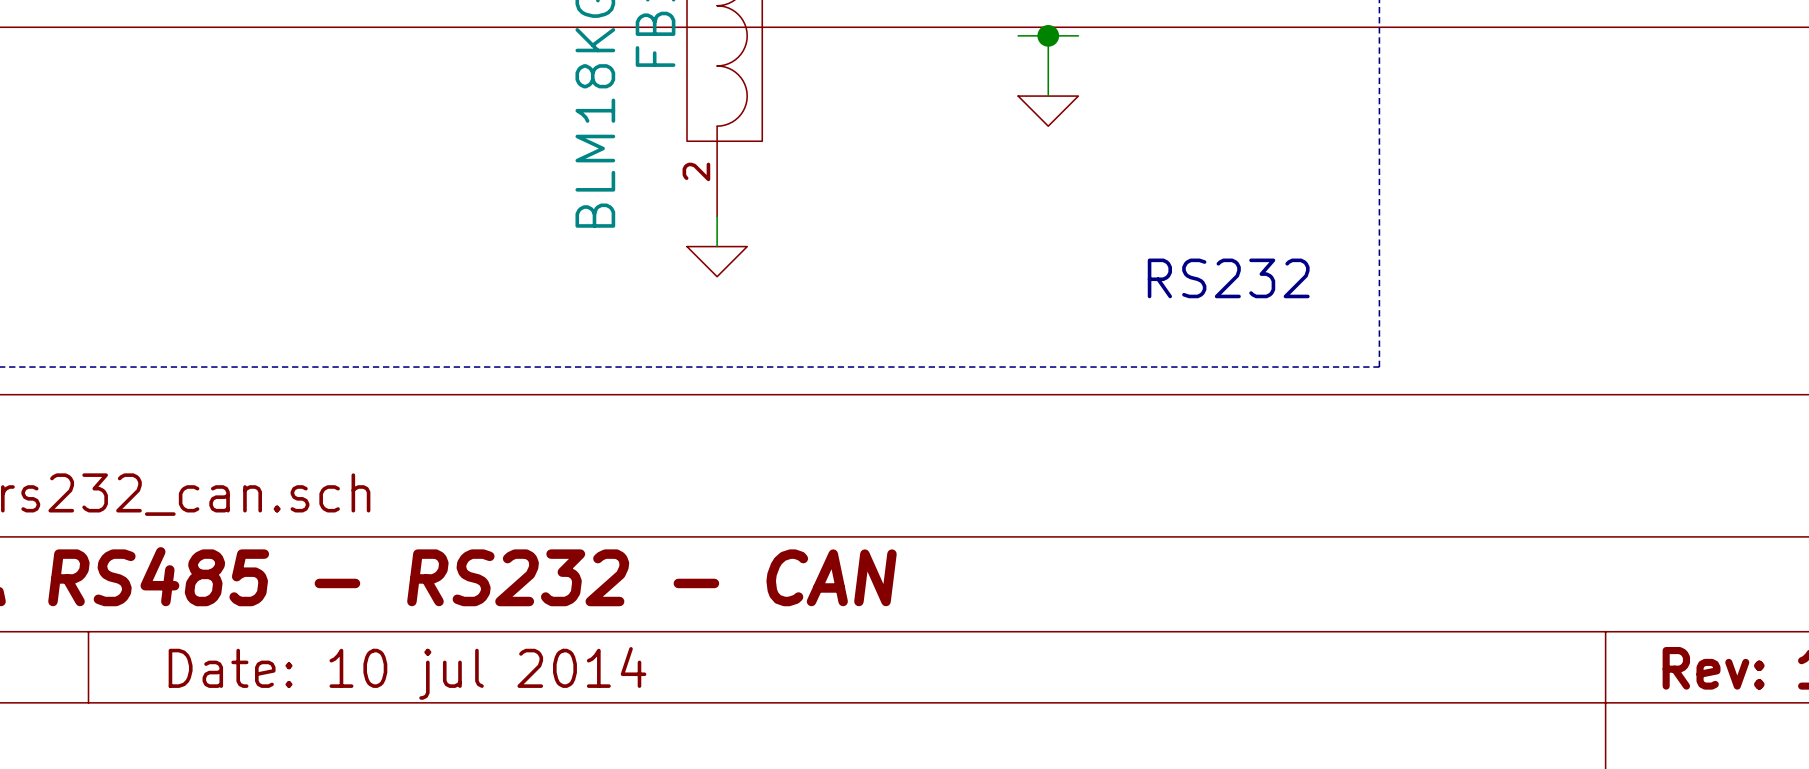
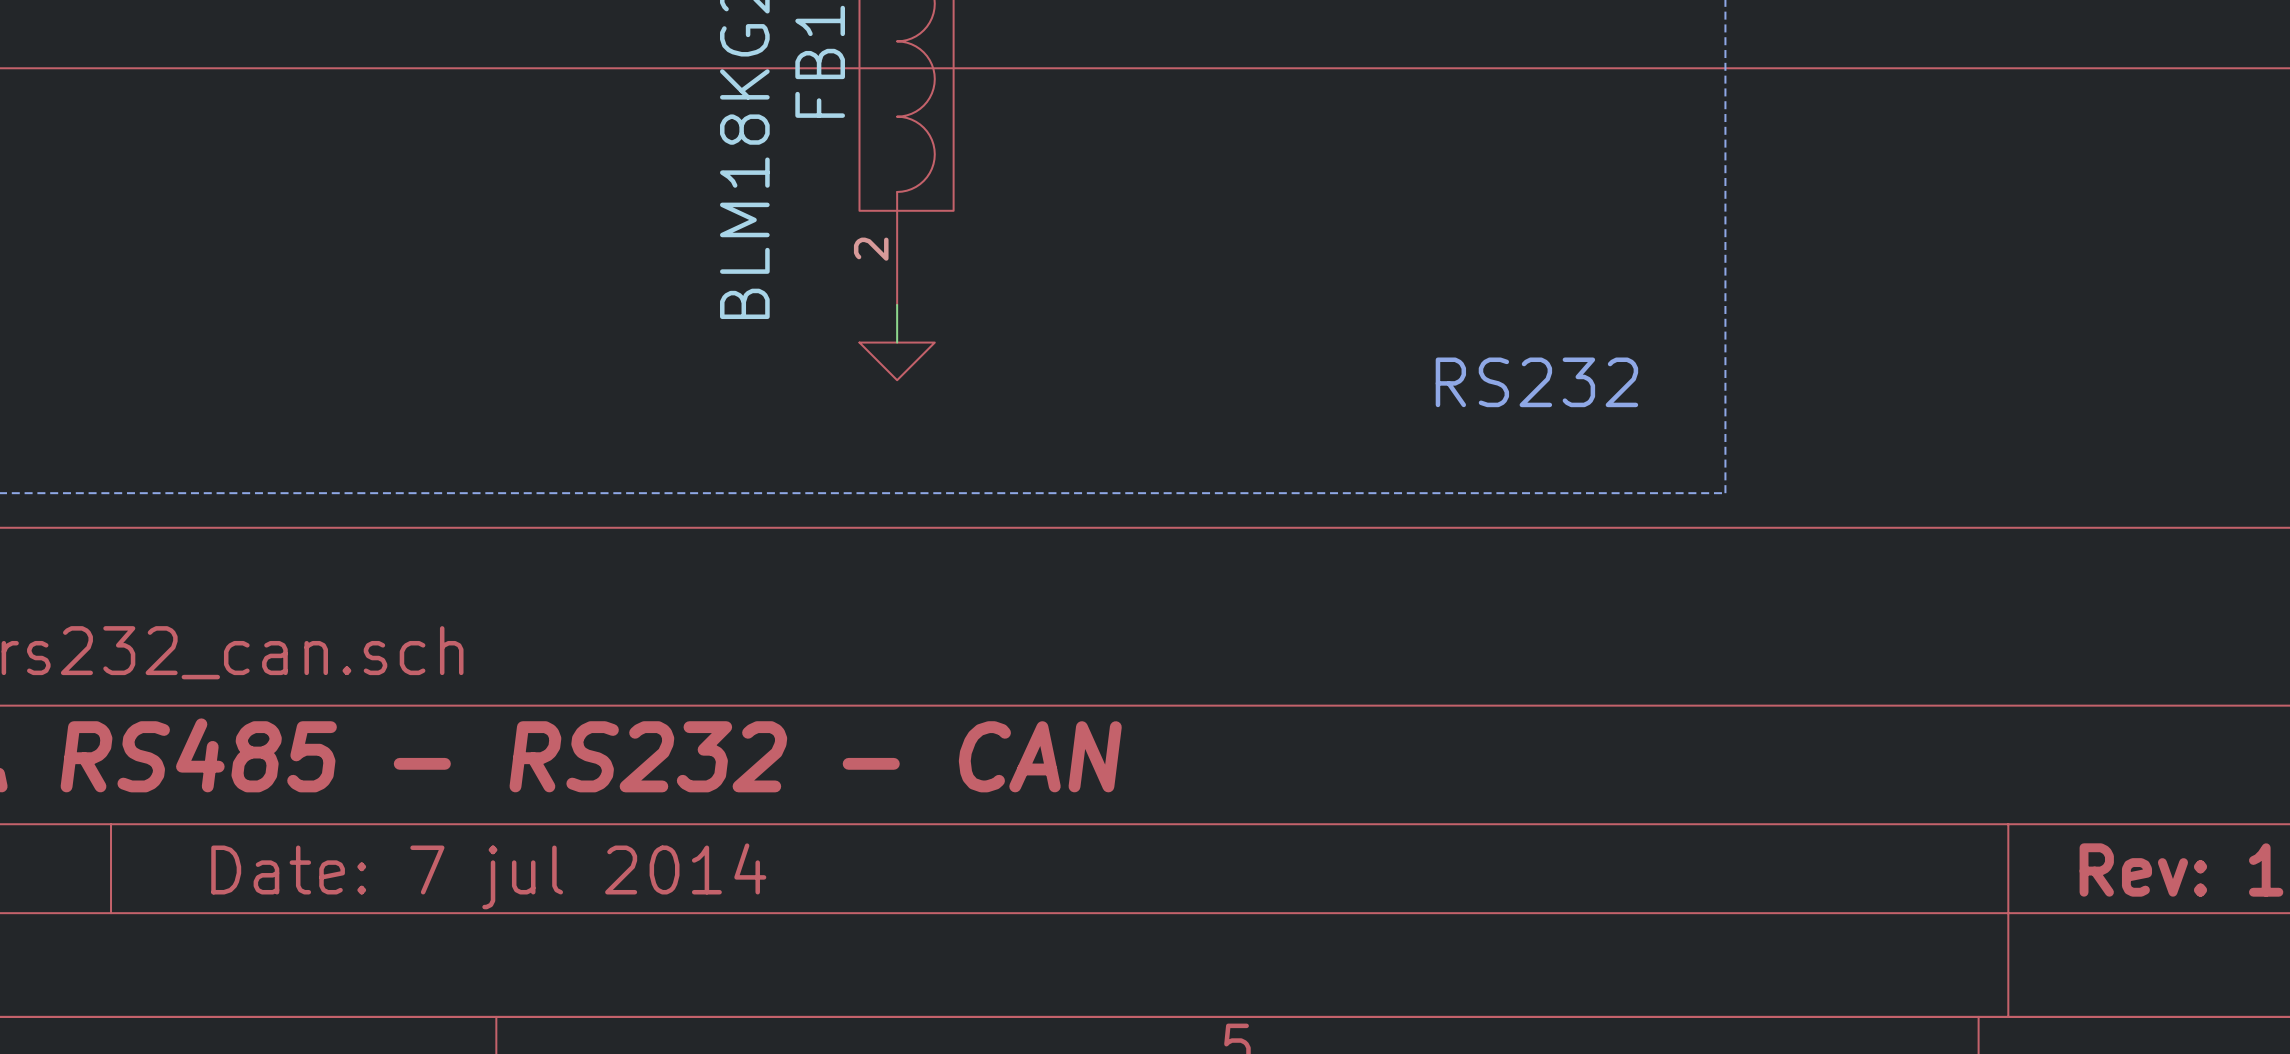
wire: (1018, 35) (1078, 35) -> none
wire: (1048, 35) (1048, 96) -> none
junction: (1048, 35) -> none
power symbol: (1048, 111) -> none
title block: Date: 10 jul 2014 (407, 673) -> Date: 7 jul 2014 (488, 876)

